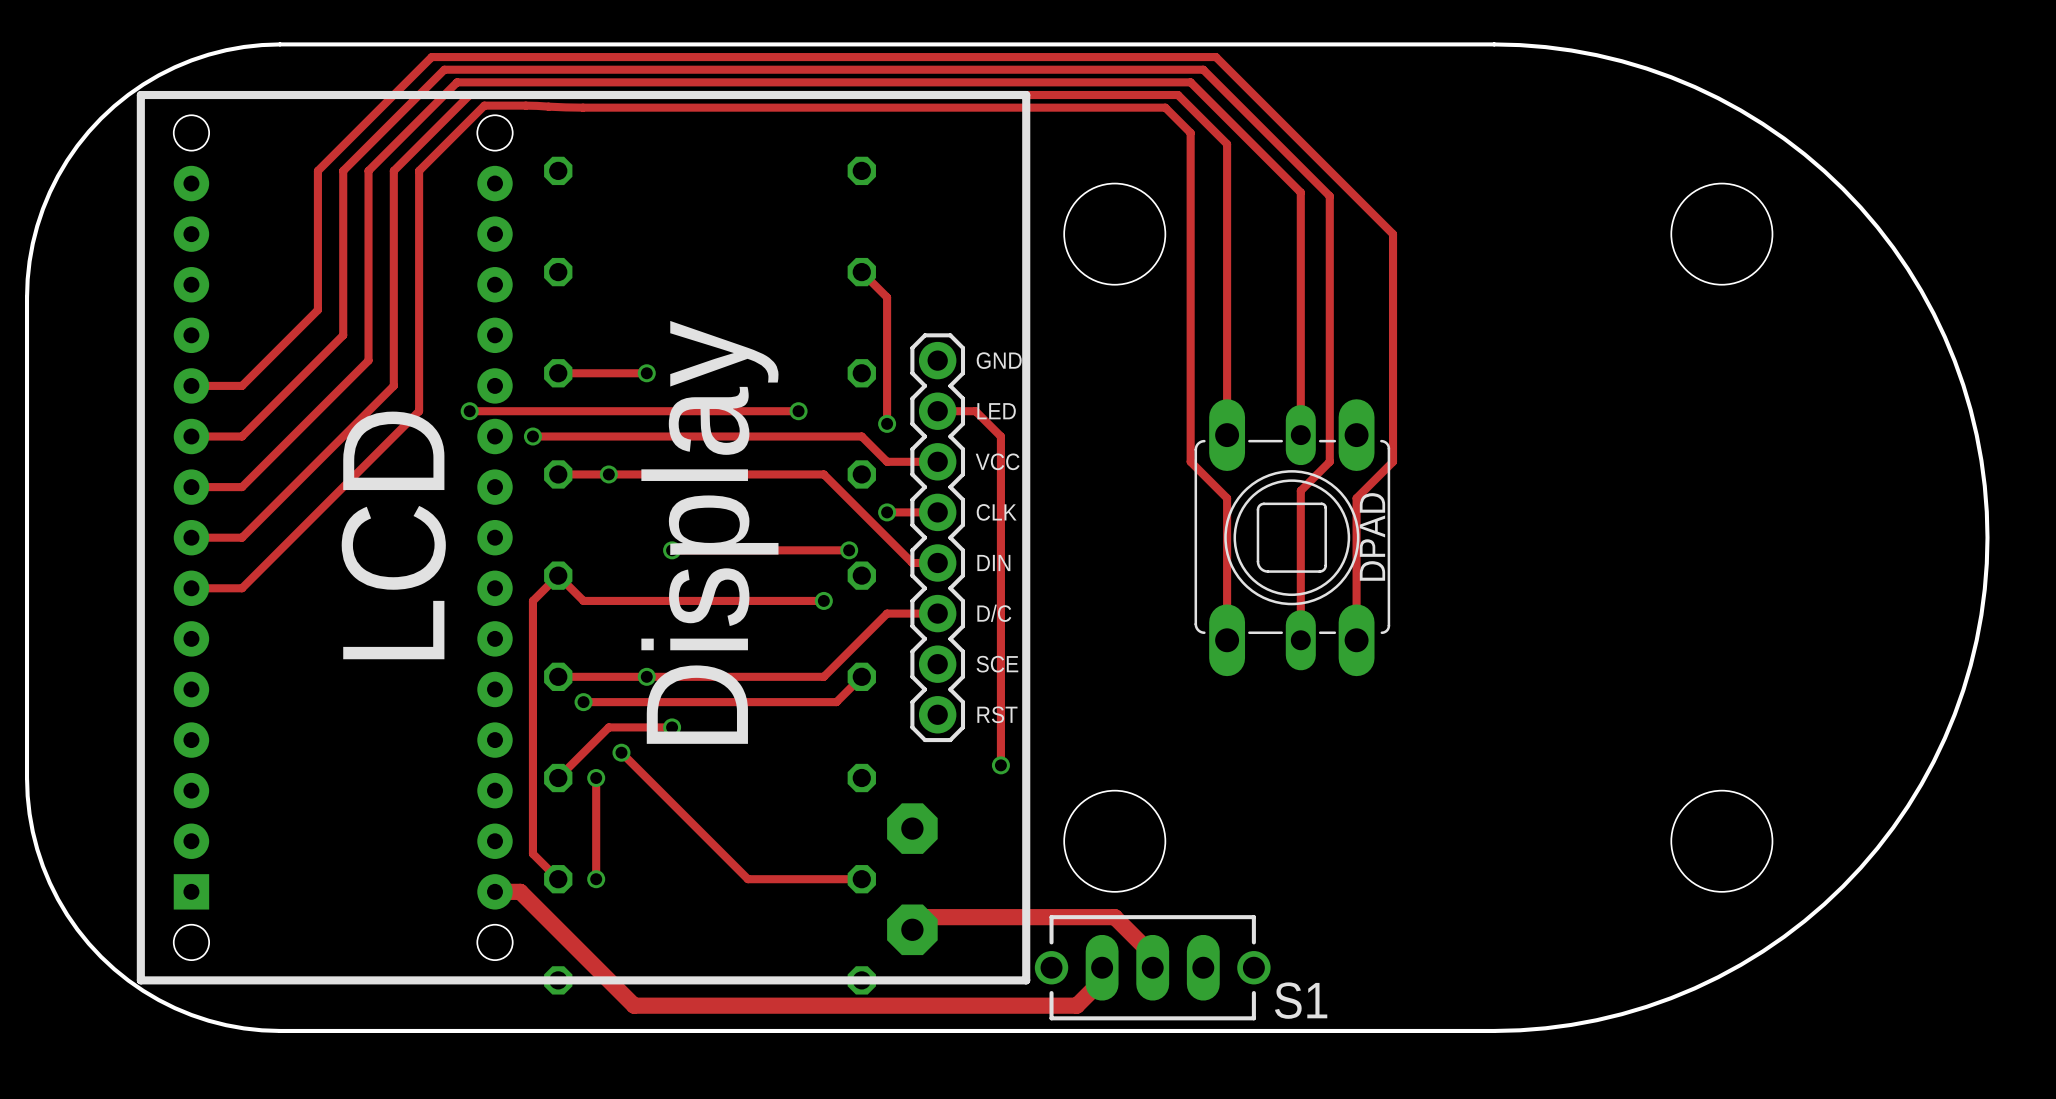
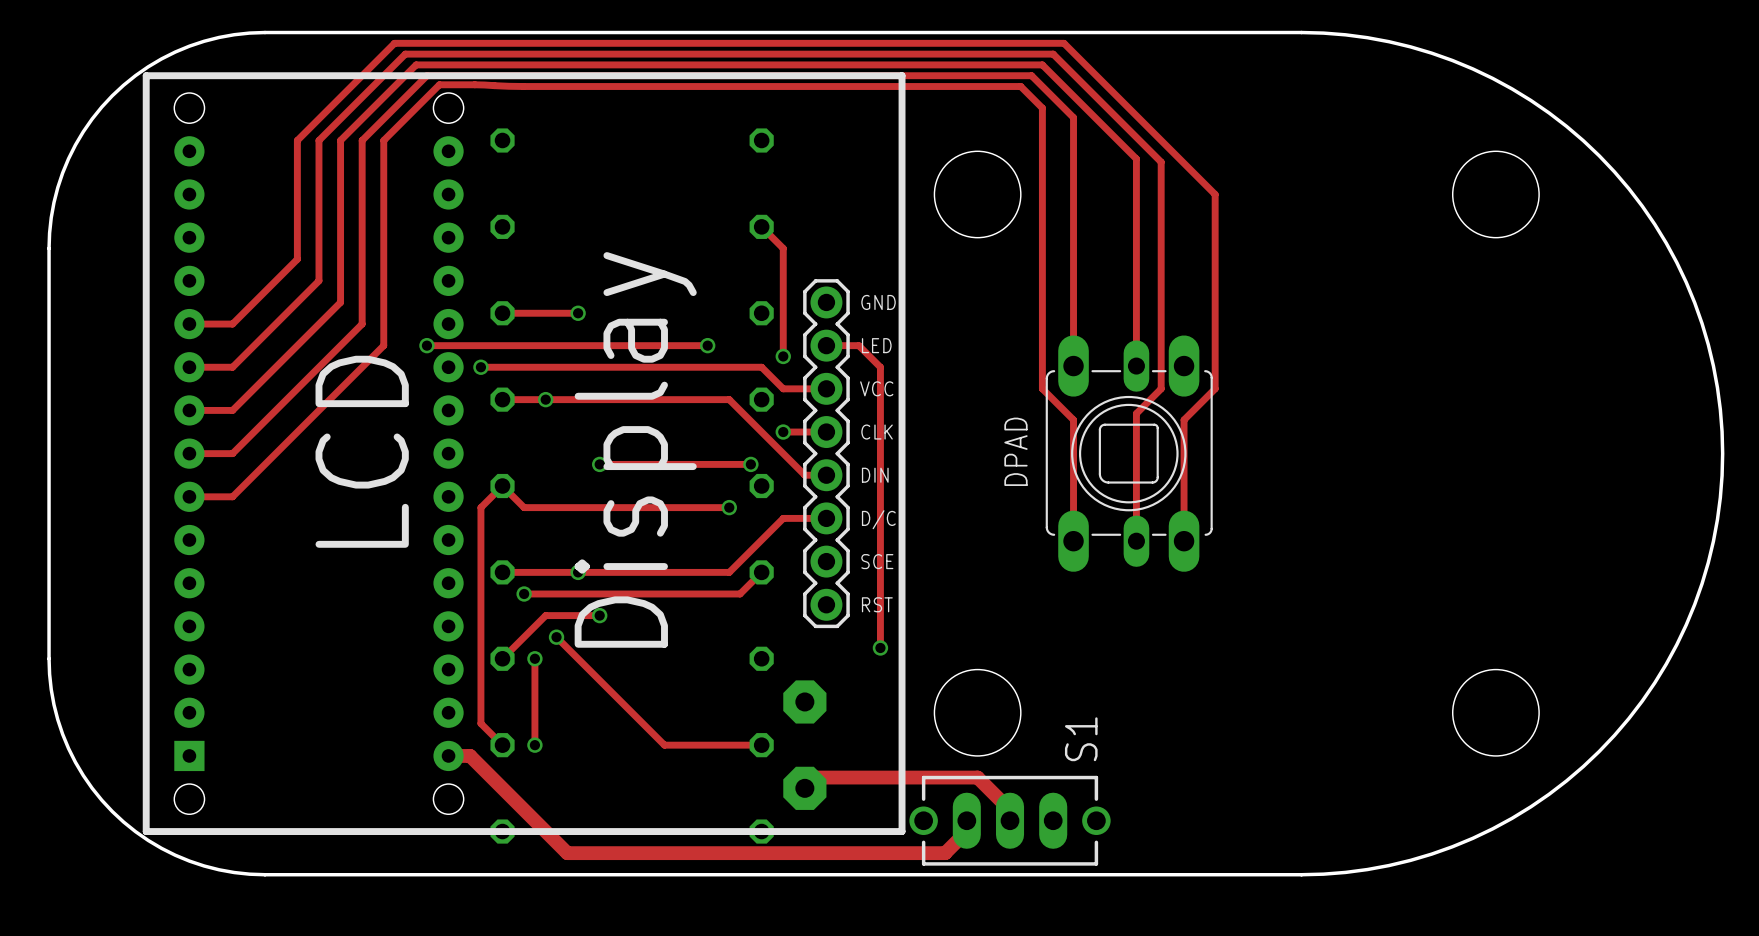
DPAD name position: DPAD (1372, 536) -> DPAD (1015, 451)
S1 name rotation: 0° (1301, 1000) -> 90° counterclockwise (1081, 739)
S1 name position: S1 (1301, 1000) -> S1 (1081, 739)

